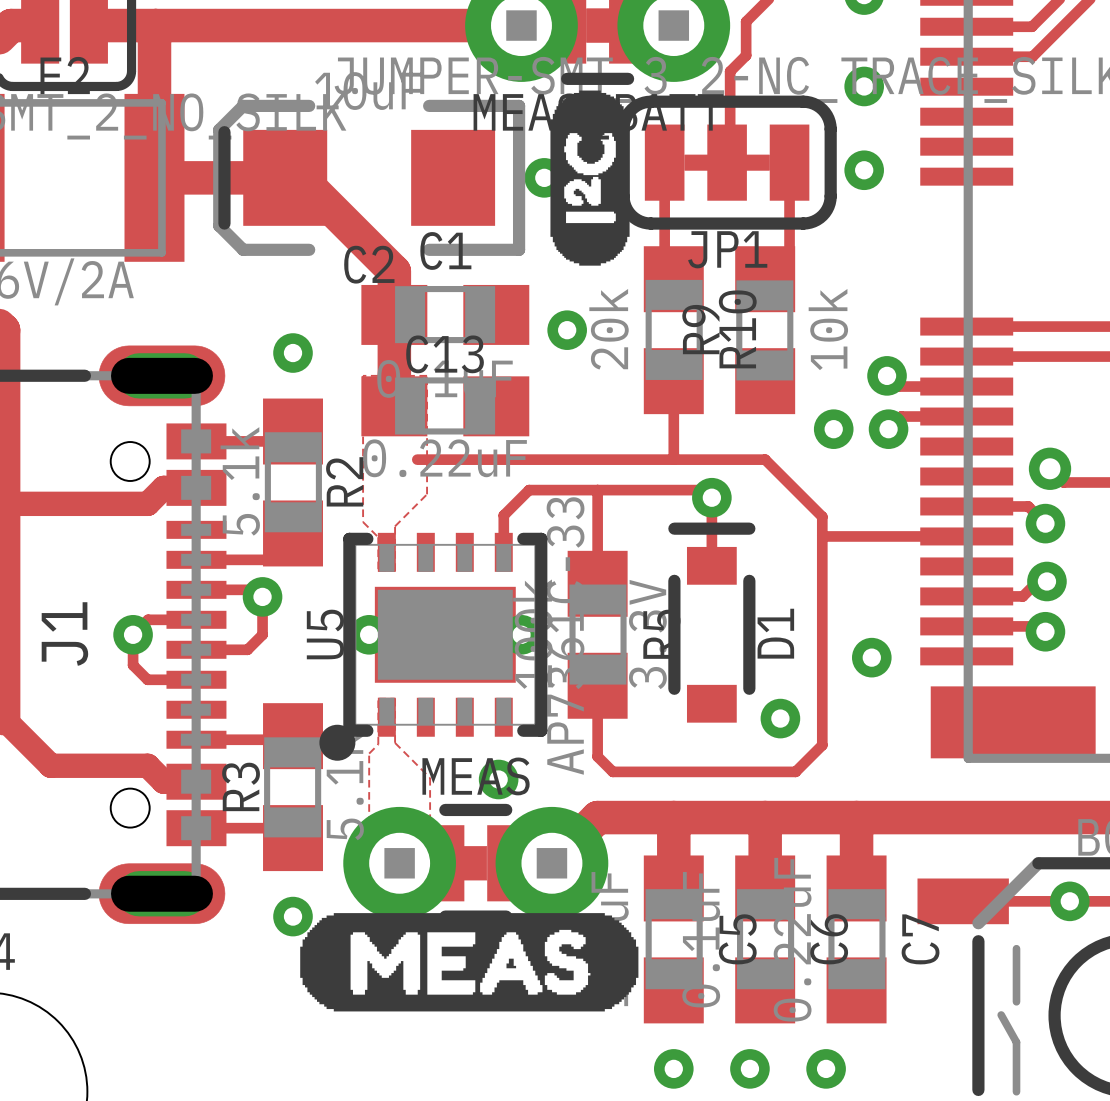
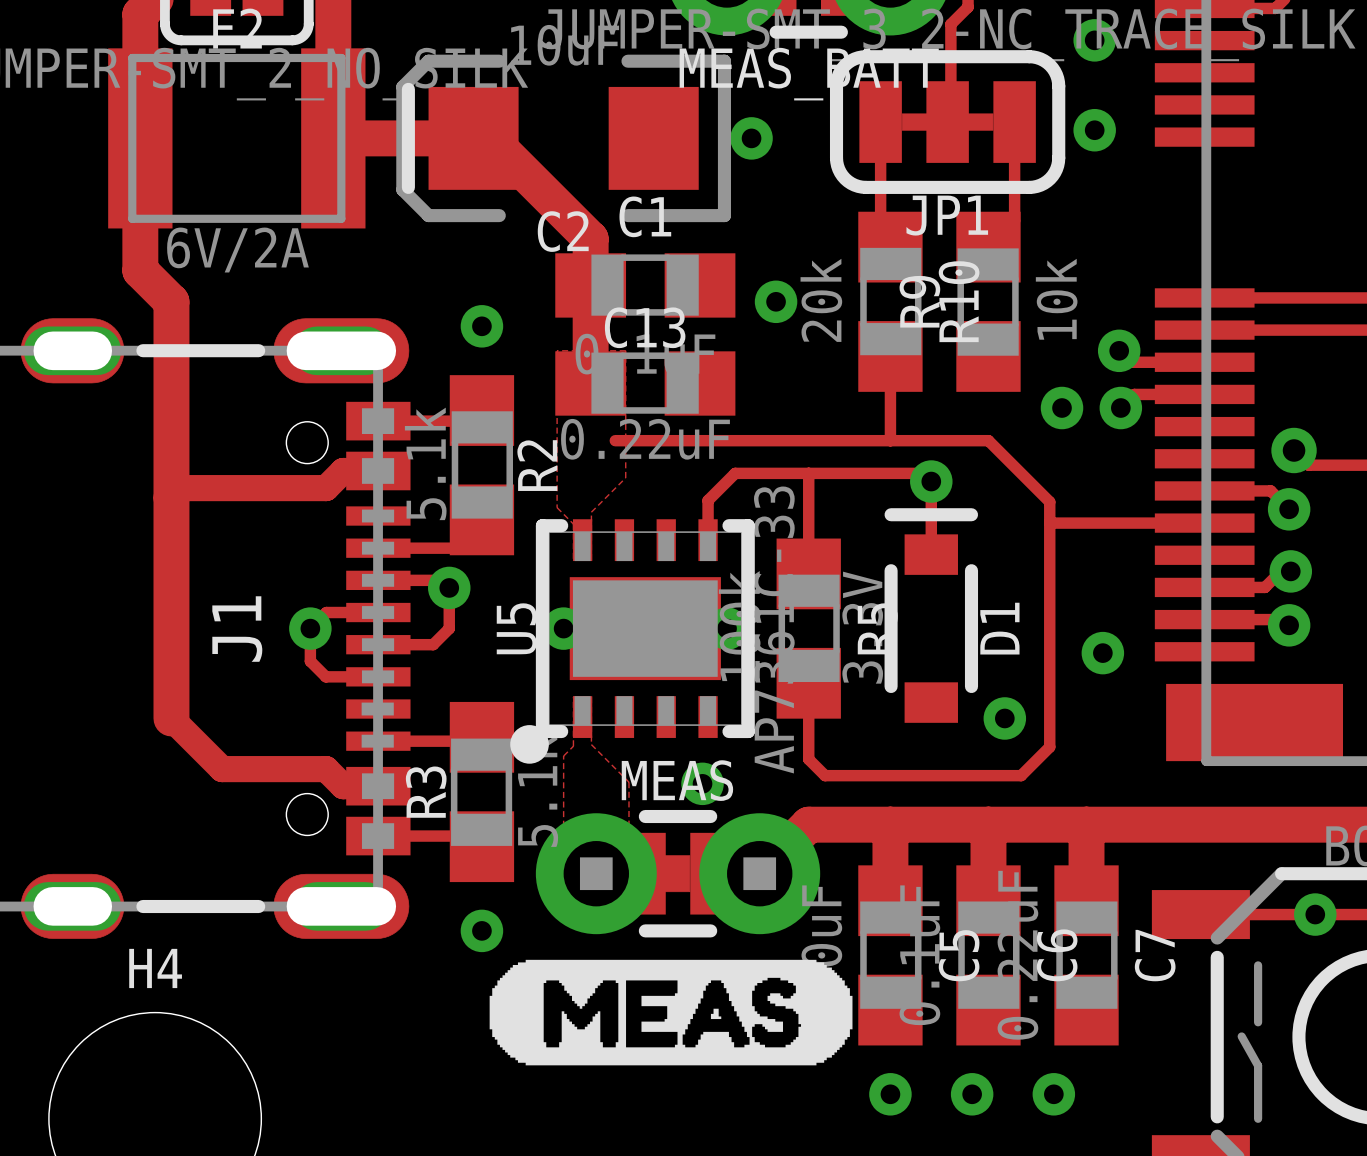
drawing: [550, 90, 630, 266] -> none
drawing position: (469, 962) -> (671, 1012)

